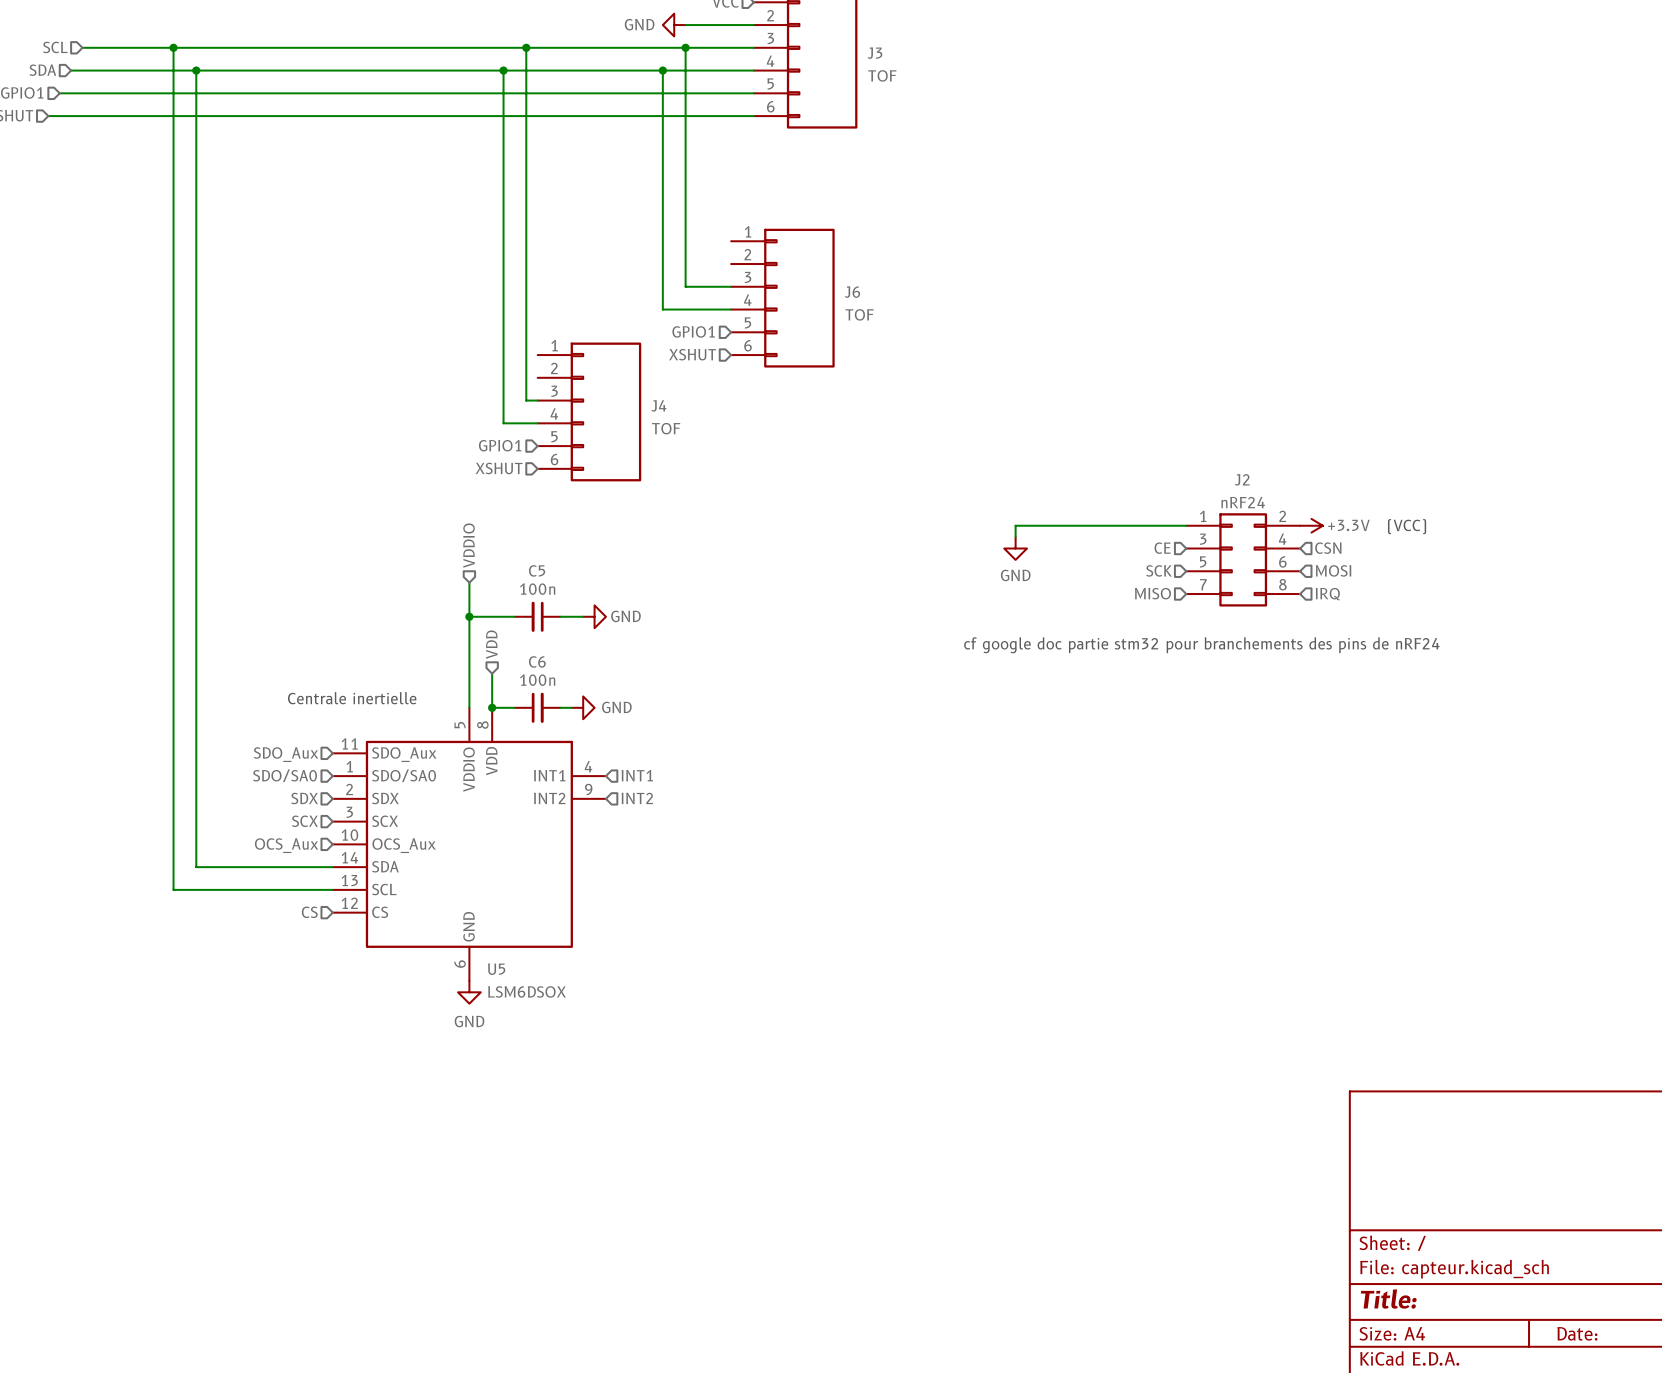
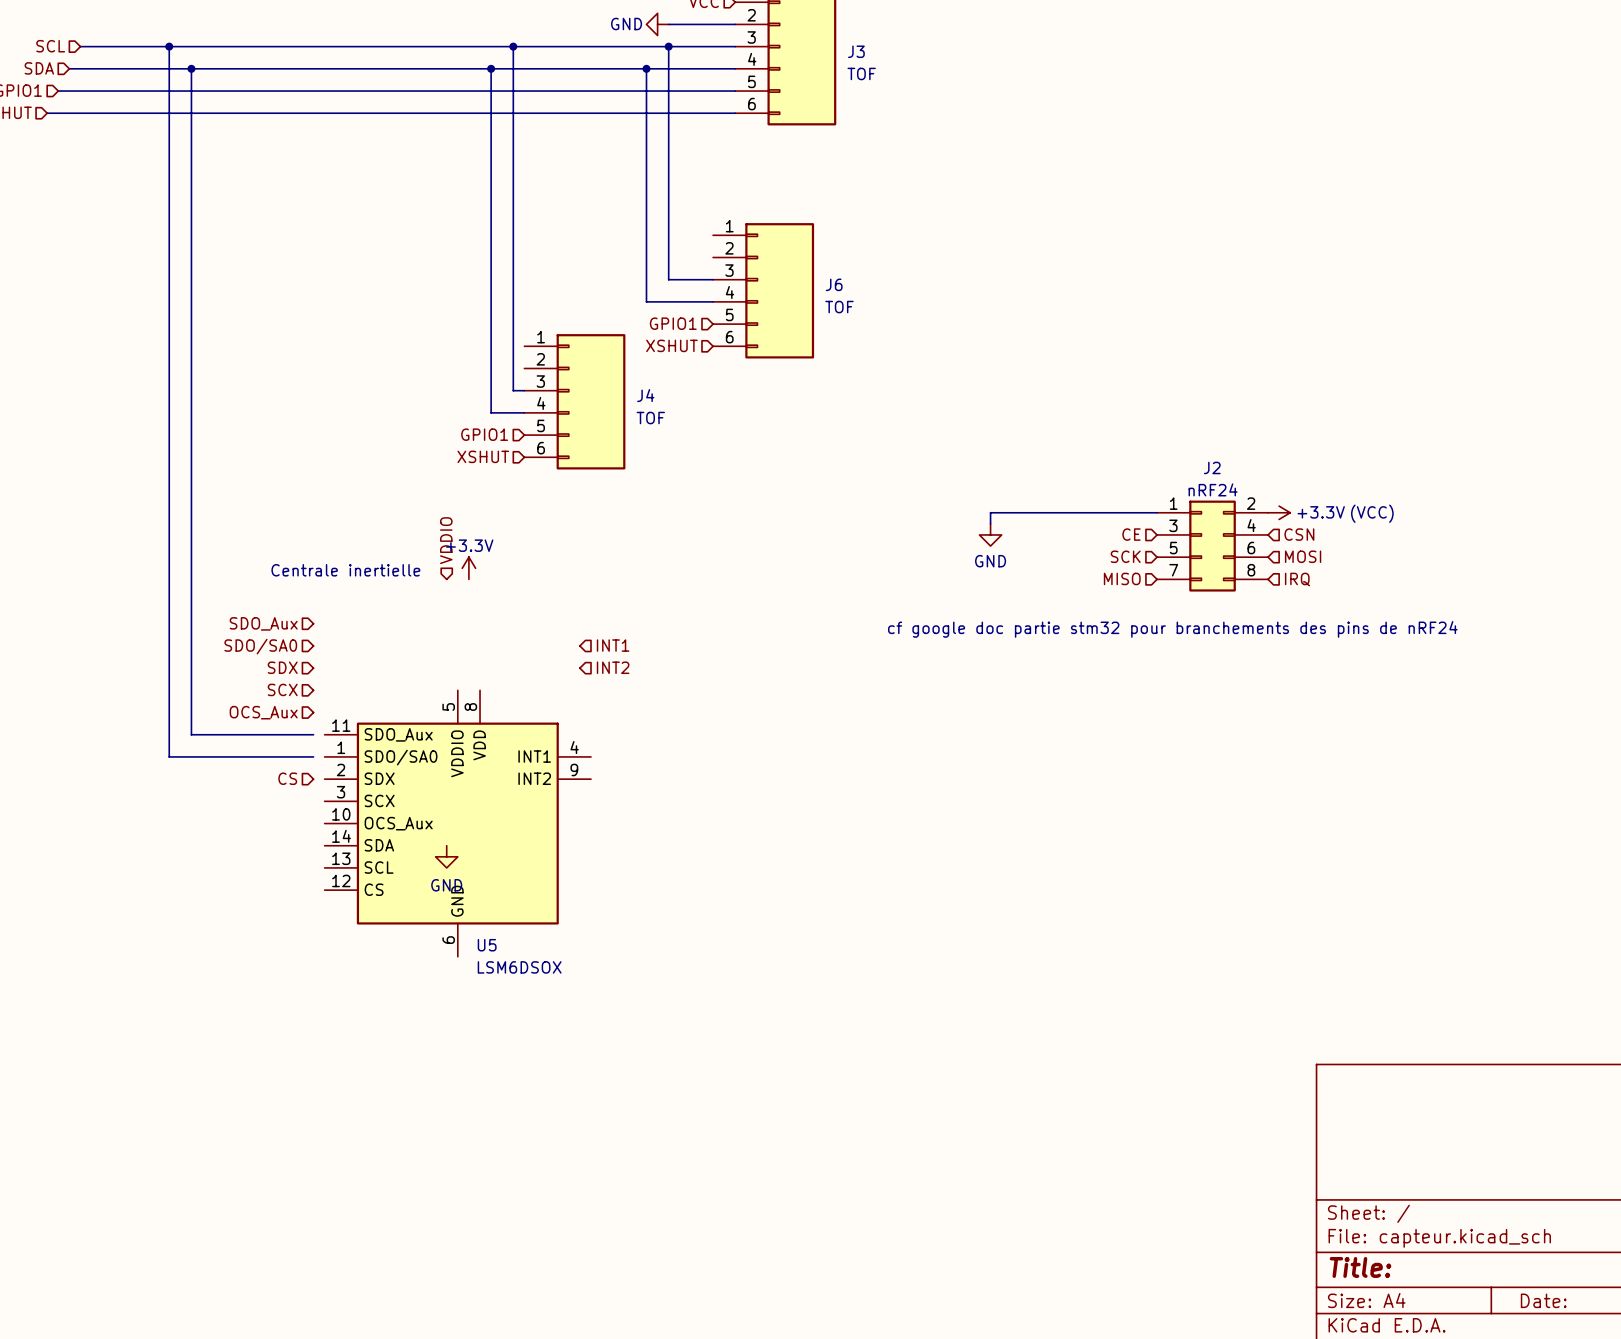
hierarchical label position: VDDIO (469, 545) -> VDDIO (446, 540)
wire: (469, 582) (469, 707) -> none
power symbol: none -> +3.3V (468, 568)
wire: (469, 616) (514, 616) -> none
junction: (469, 616) -> none
C5: 100n (537, 616) -> none
wire: (560, 616) (583, 616) -> none
power symbol: GND (594, 616) -> none
hierarchical label: VDD (491, 644) -> none
wire: (492, 673) (492, 707) (514, 707) -> none
text position: Centrale inertielle (352, 698) -> Centrale inertielle (345, 570)
junction: (492, 707) -> none
C6: 100n (537, 707) -> none
wire: (560, 707) (571, 707) -> none
power symbol: GND (583, 707) -> none
wire: (196, 753) (196, 867) (332, 867) -> (191, 734) (313, 734)
hierarchical label position: SDO_Aux (286, 754) -> SDO_Aux (263, 623)
hierarchical label position: SDO/SA0 (285, 775) -> SDO/SA0 (260, 646)
hierarchical label position: INT1 (637, 775) -> INT1 (613, 645)
wire: (173, 776) (173, 889) (332, 889) -> (169, 756) (313, 756)
hierarchical label position: SDX (304, 798) -> SDX (282, 667)
hierarchical label position: INT2 (637, 798) -> INT2 (613, 667)
hierarchical label position: SCX (304, 821) -> SCX (282, 689)
hierarchical label position: OCS_Aux (286, 845) -> OCS_Aux (263, 712)
power symbol: none -> GND (446, 856)
hierarchical label position: CS (309, 912) -> CS (287, 778)
power symbol: GND (469, 992) -> none

